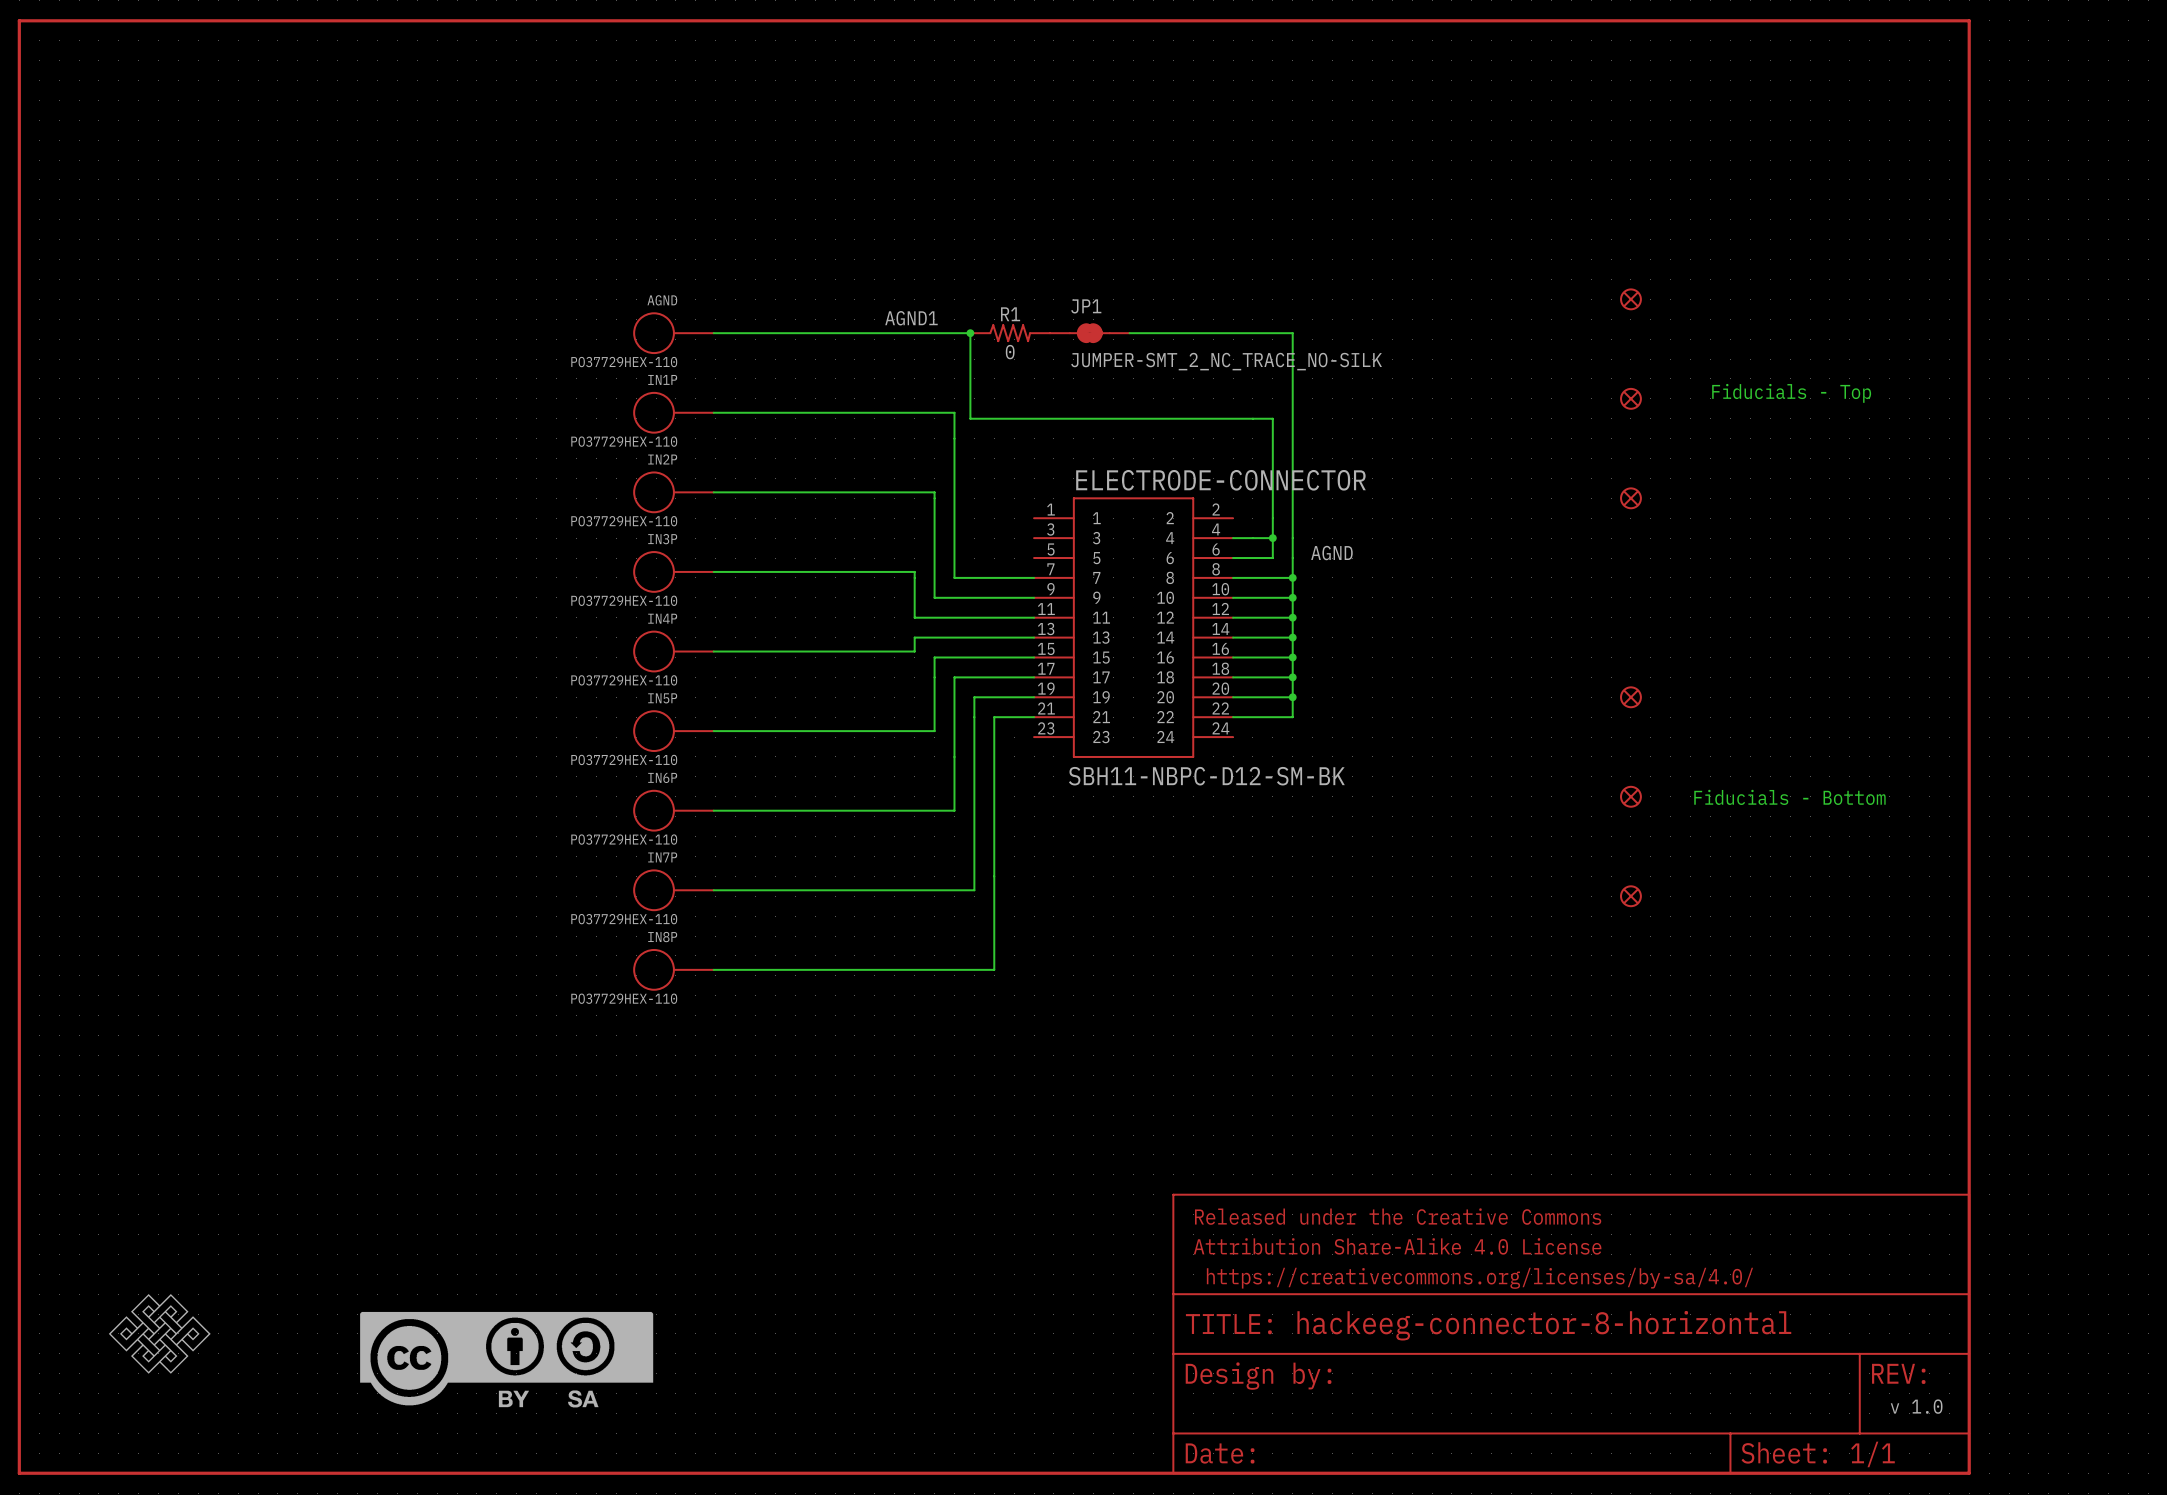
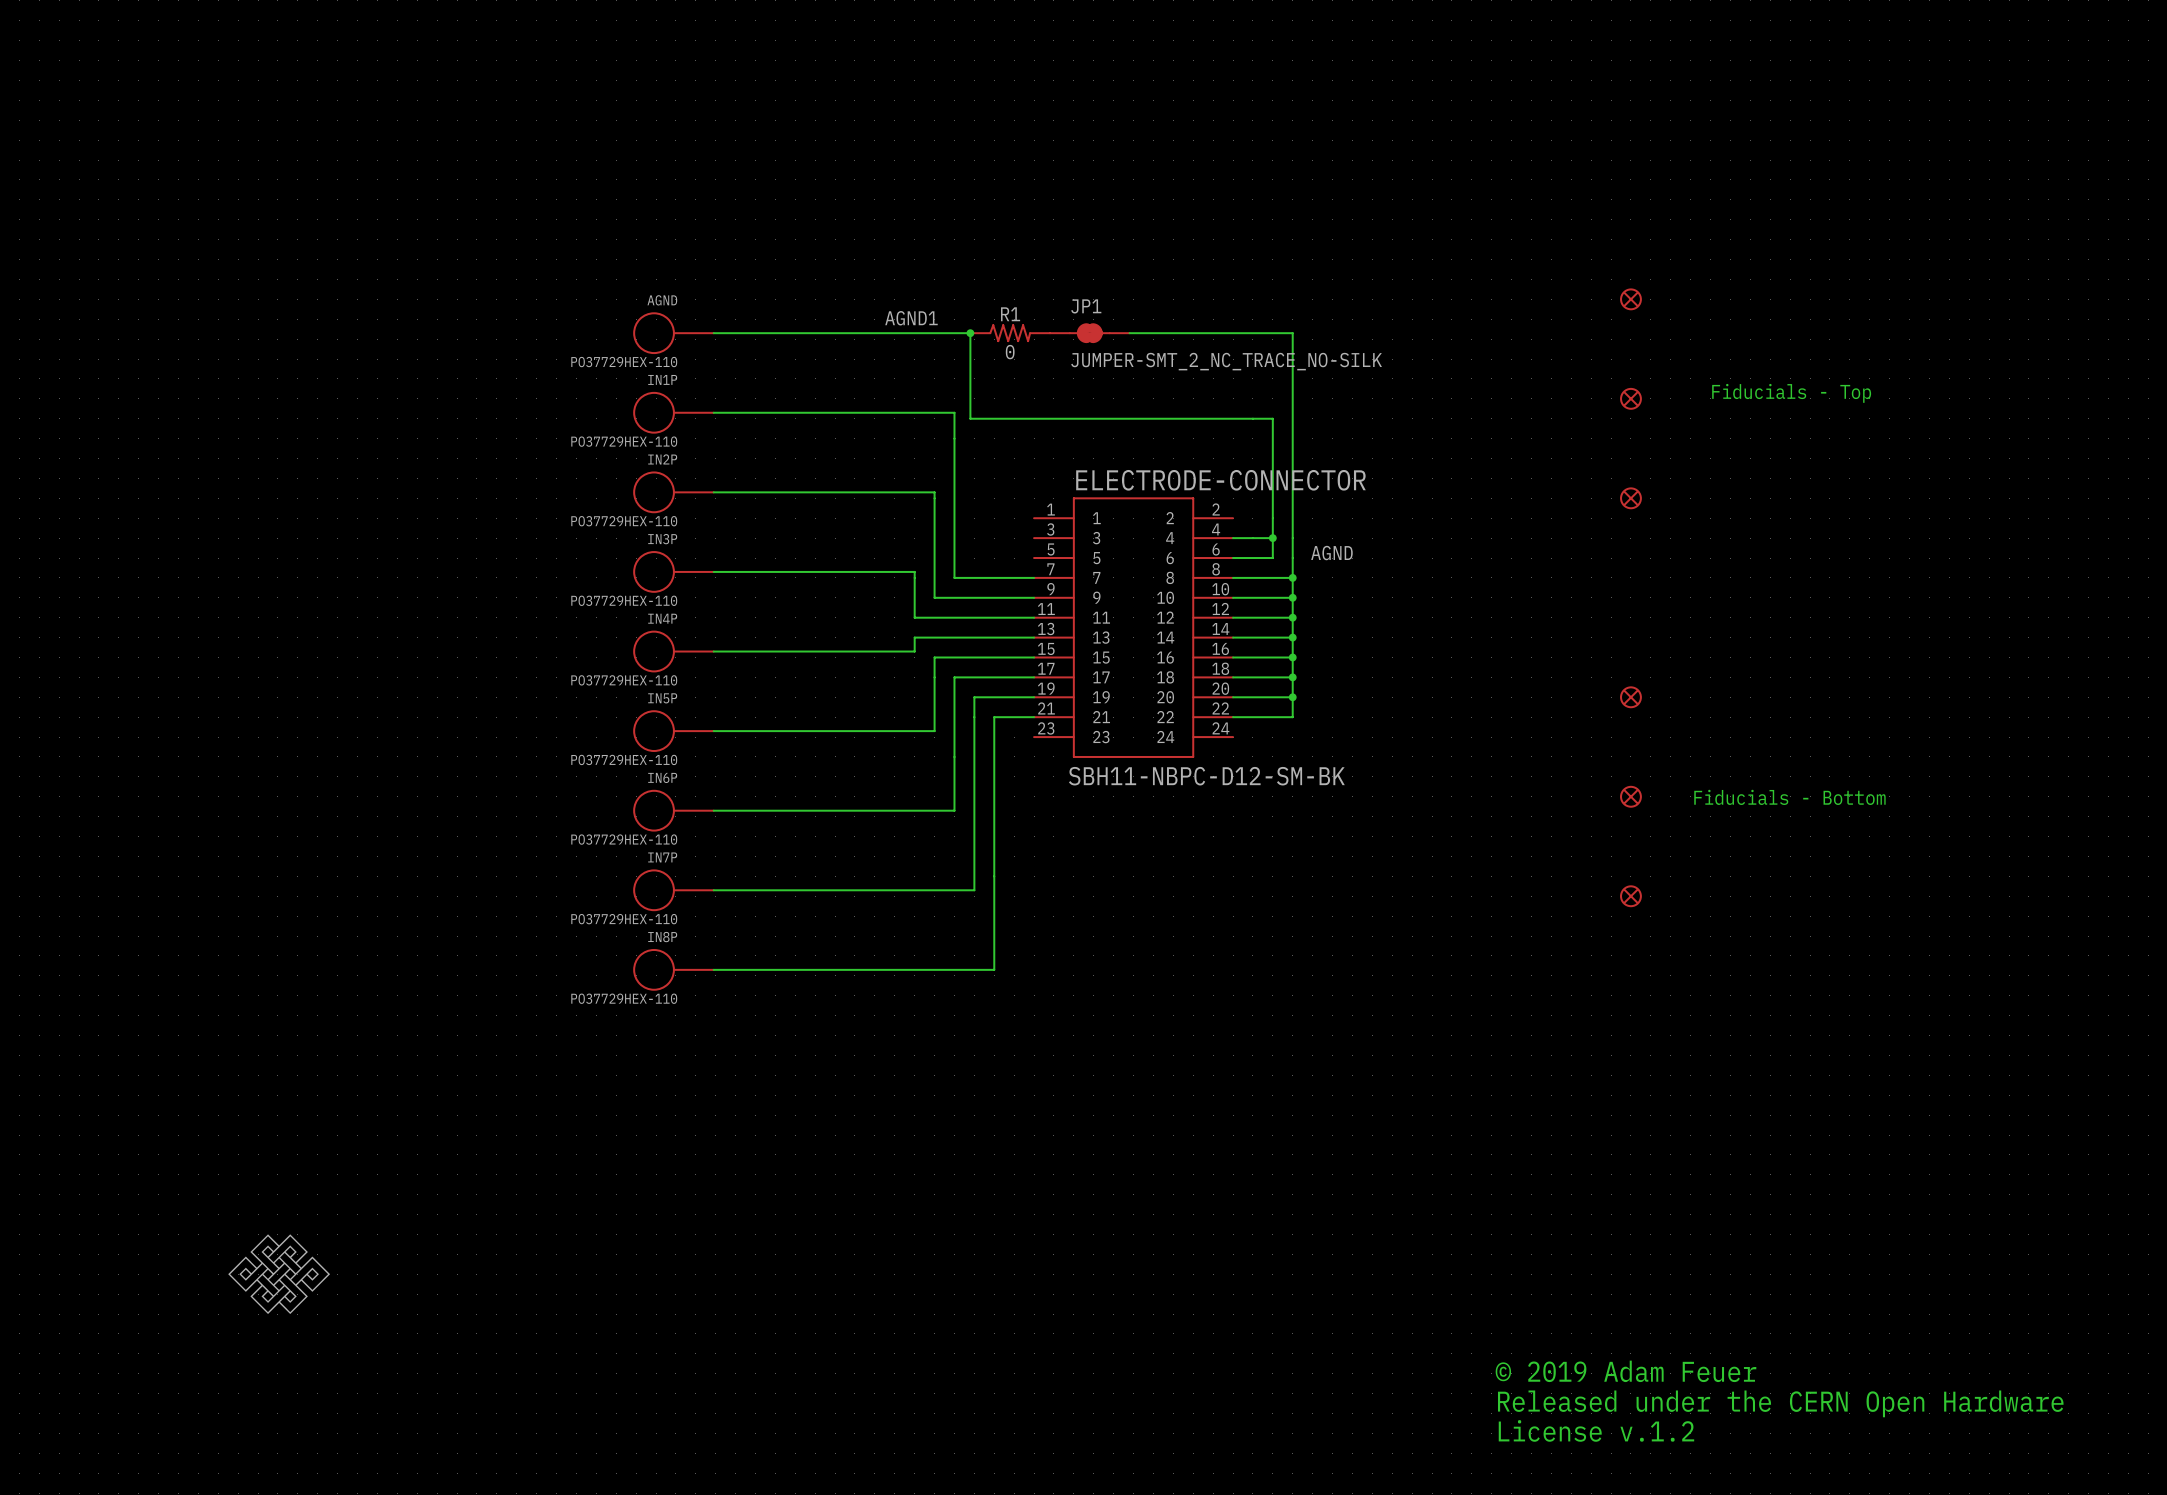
part: (994, 747) -> none
part position: (159, 1333) -> (279, 1274)
part: (1571, 1333) -> none
part: (506, 1359) -> none
text: none -> © 2019 Adam Feuer (1625, 1371)
text: none -> Released under the CERN Open Hardware (1780, 1403)
text: v 1.0 (1916, 1406) -> none
text: none -> License v.1.2 (1596, 1430)

